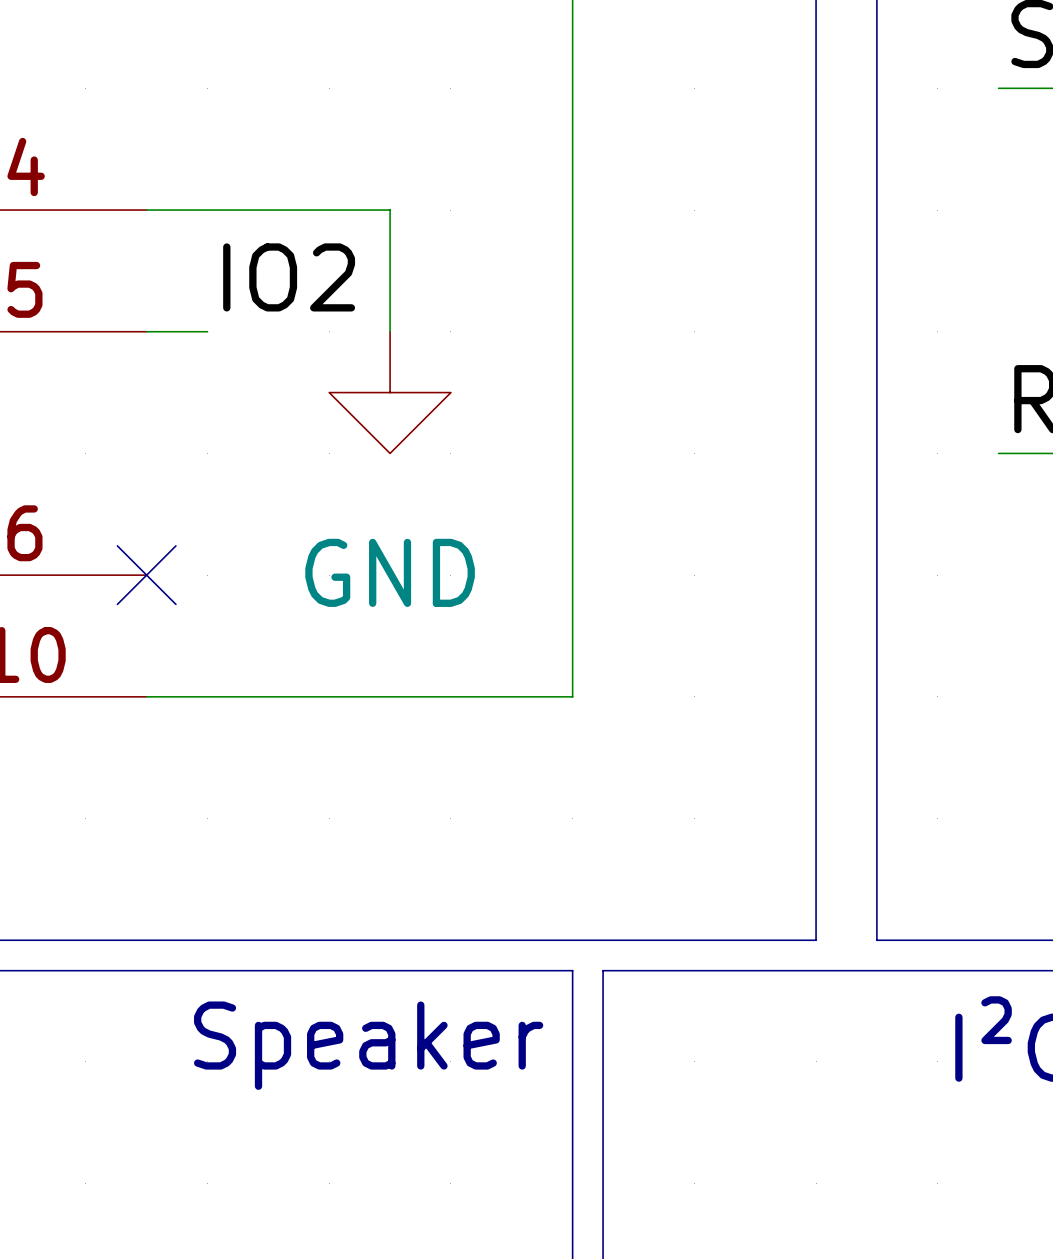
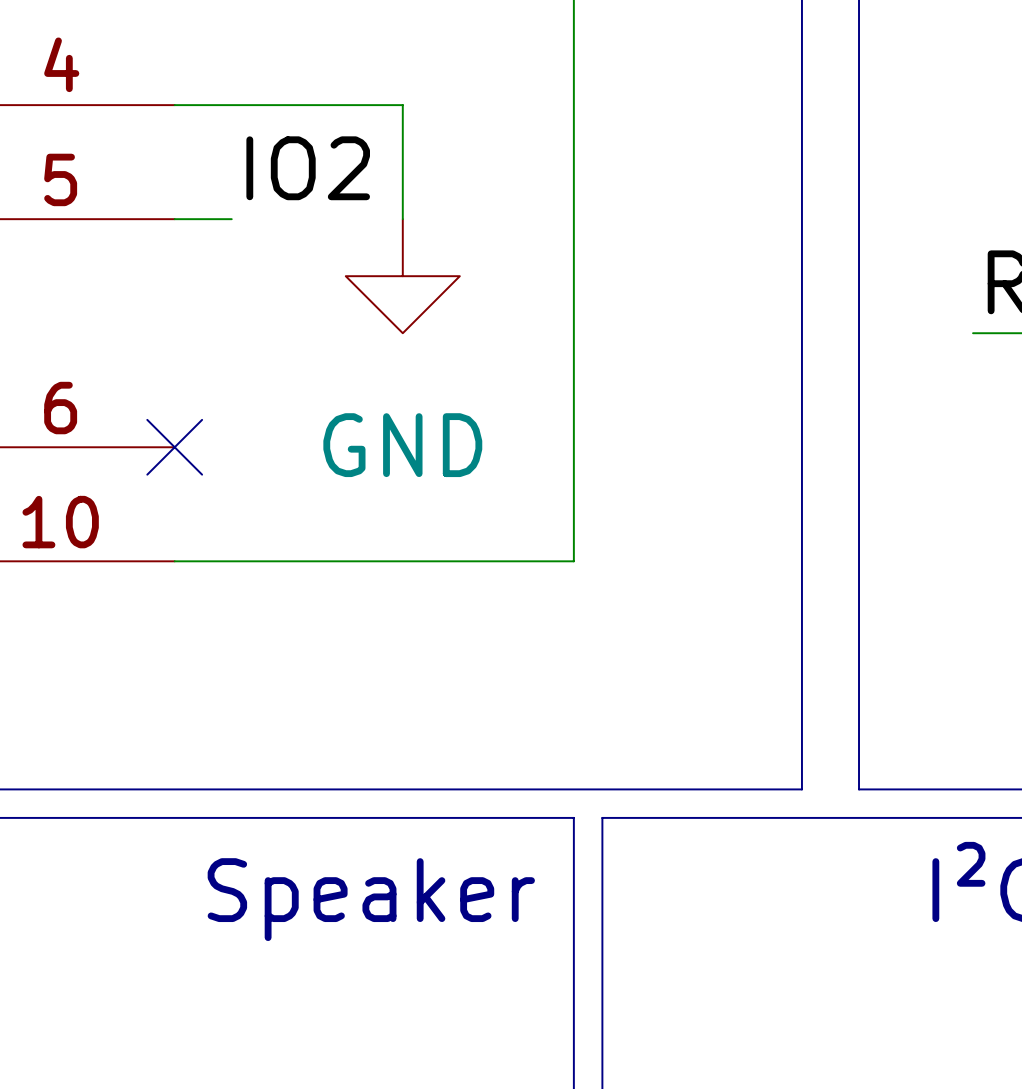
text position: Speaker (368, 1045) -> Speaker (371, 899)

